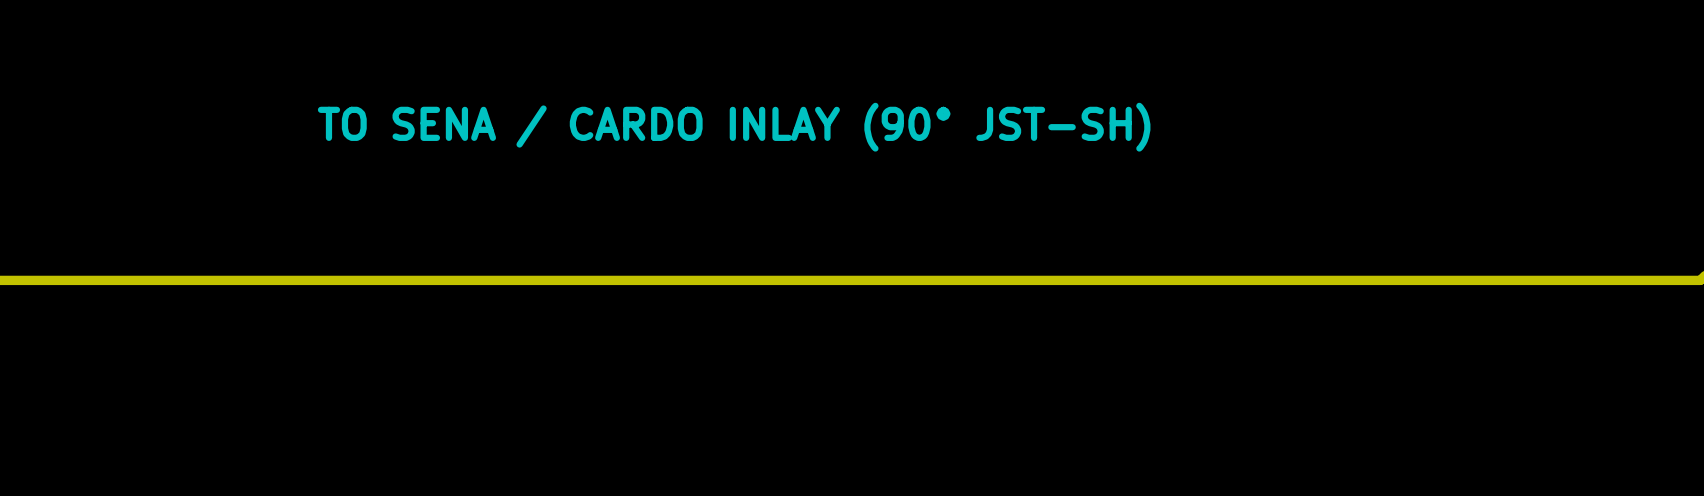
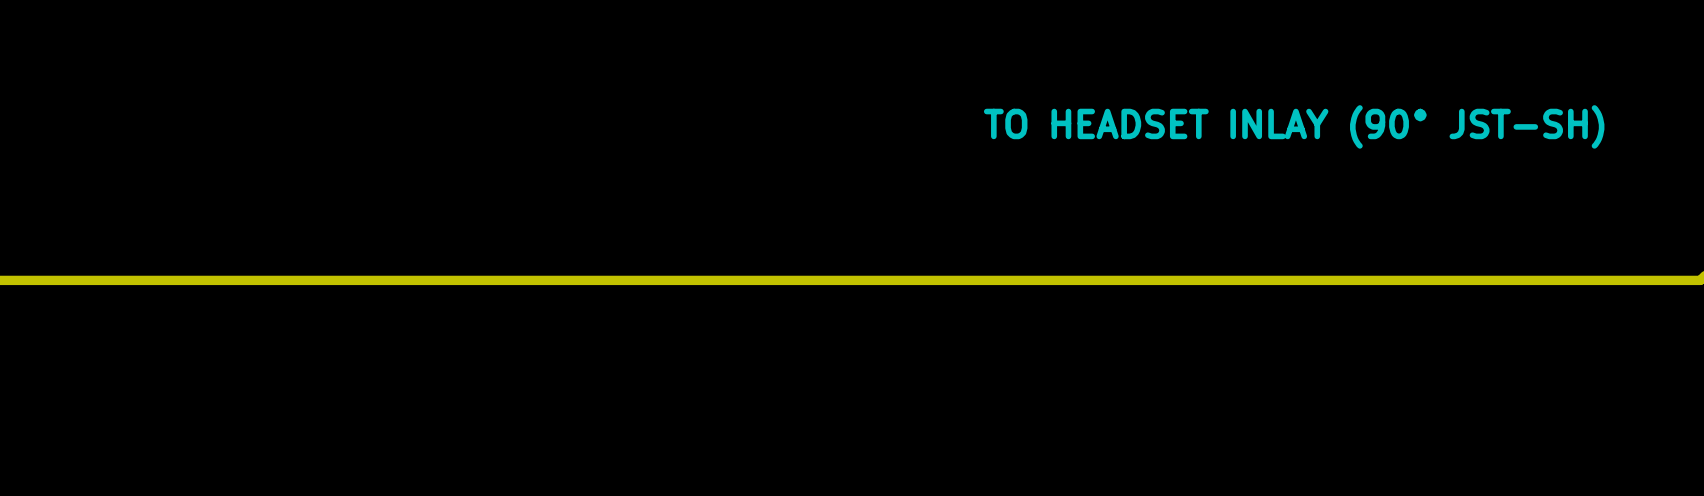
text: TO SENA / CARDO INLAY (90° JST-SH) (734, 127) -> TO HEADSET INLAY (90° JST-SH) (1294, 126)

